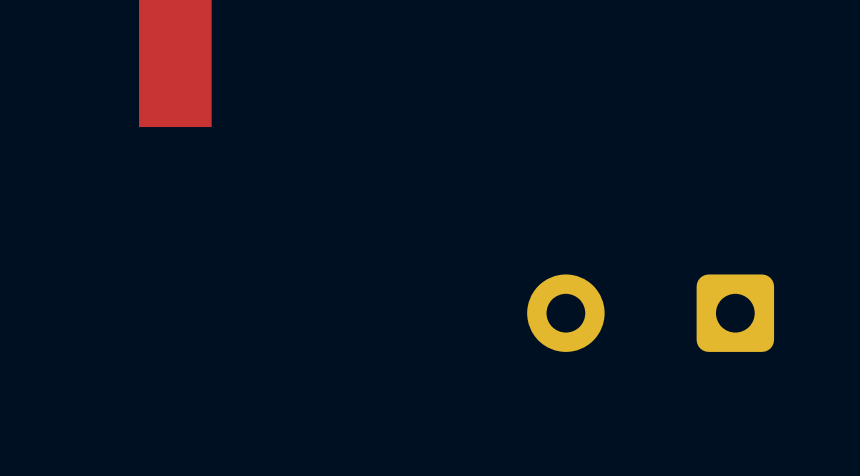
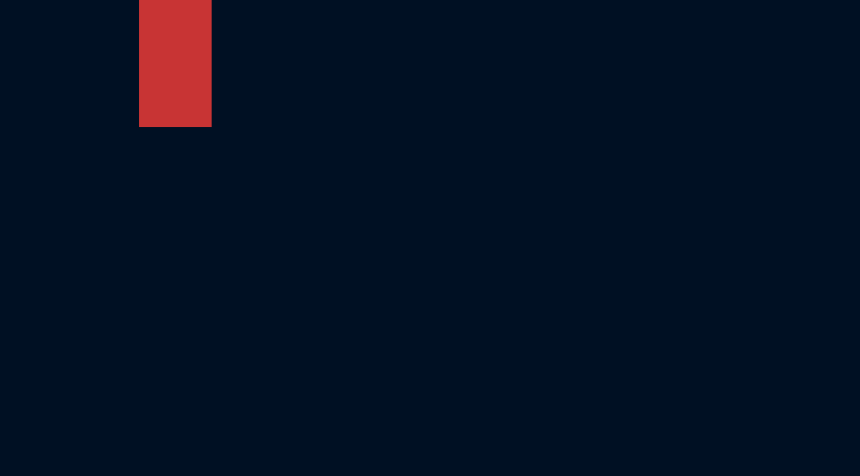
part: (650, 313) -> none

